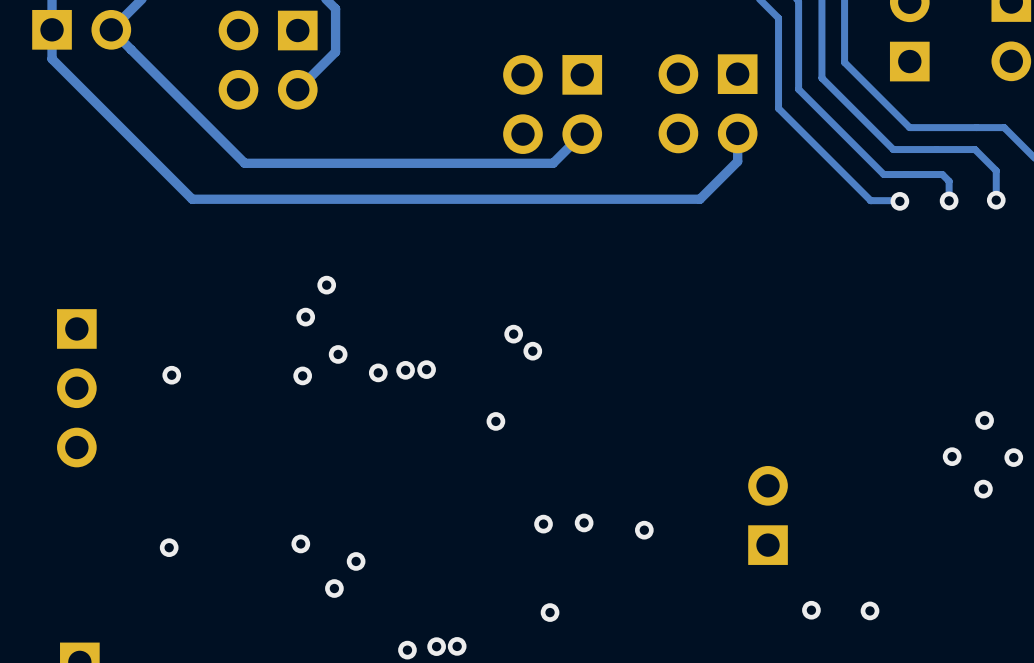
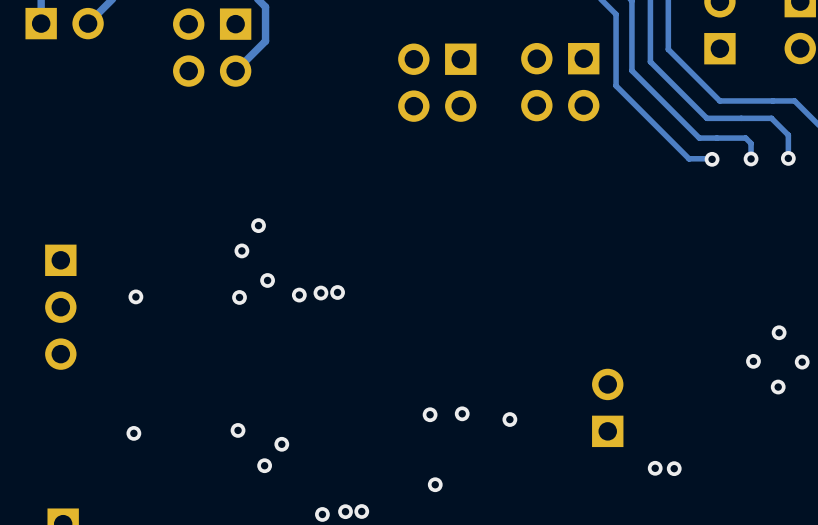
track: (52, 29) (52, 58) (192, 199) (699, 199) (737, 161) (737, 133) -> none
track: (111, 29) (244, 163) (553, 163) (582, 134) -> none
via: (513, 334) -> none
via: (532, 351) -> none
via: (495, 421) -> none
via: none -> (655, 468)
via: none -> (674, 468)
via: (811, 610) -> none
via: (870, 610) -> none

